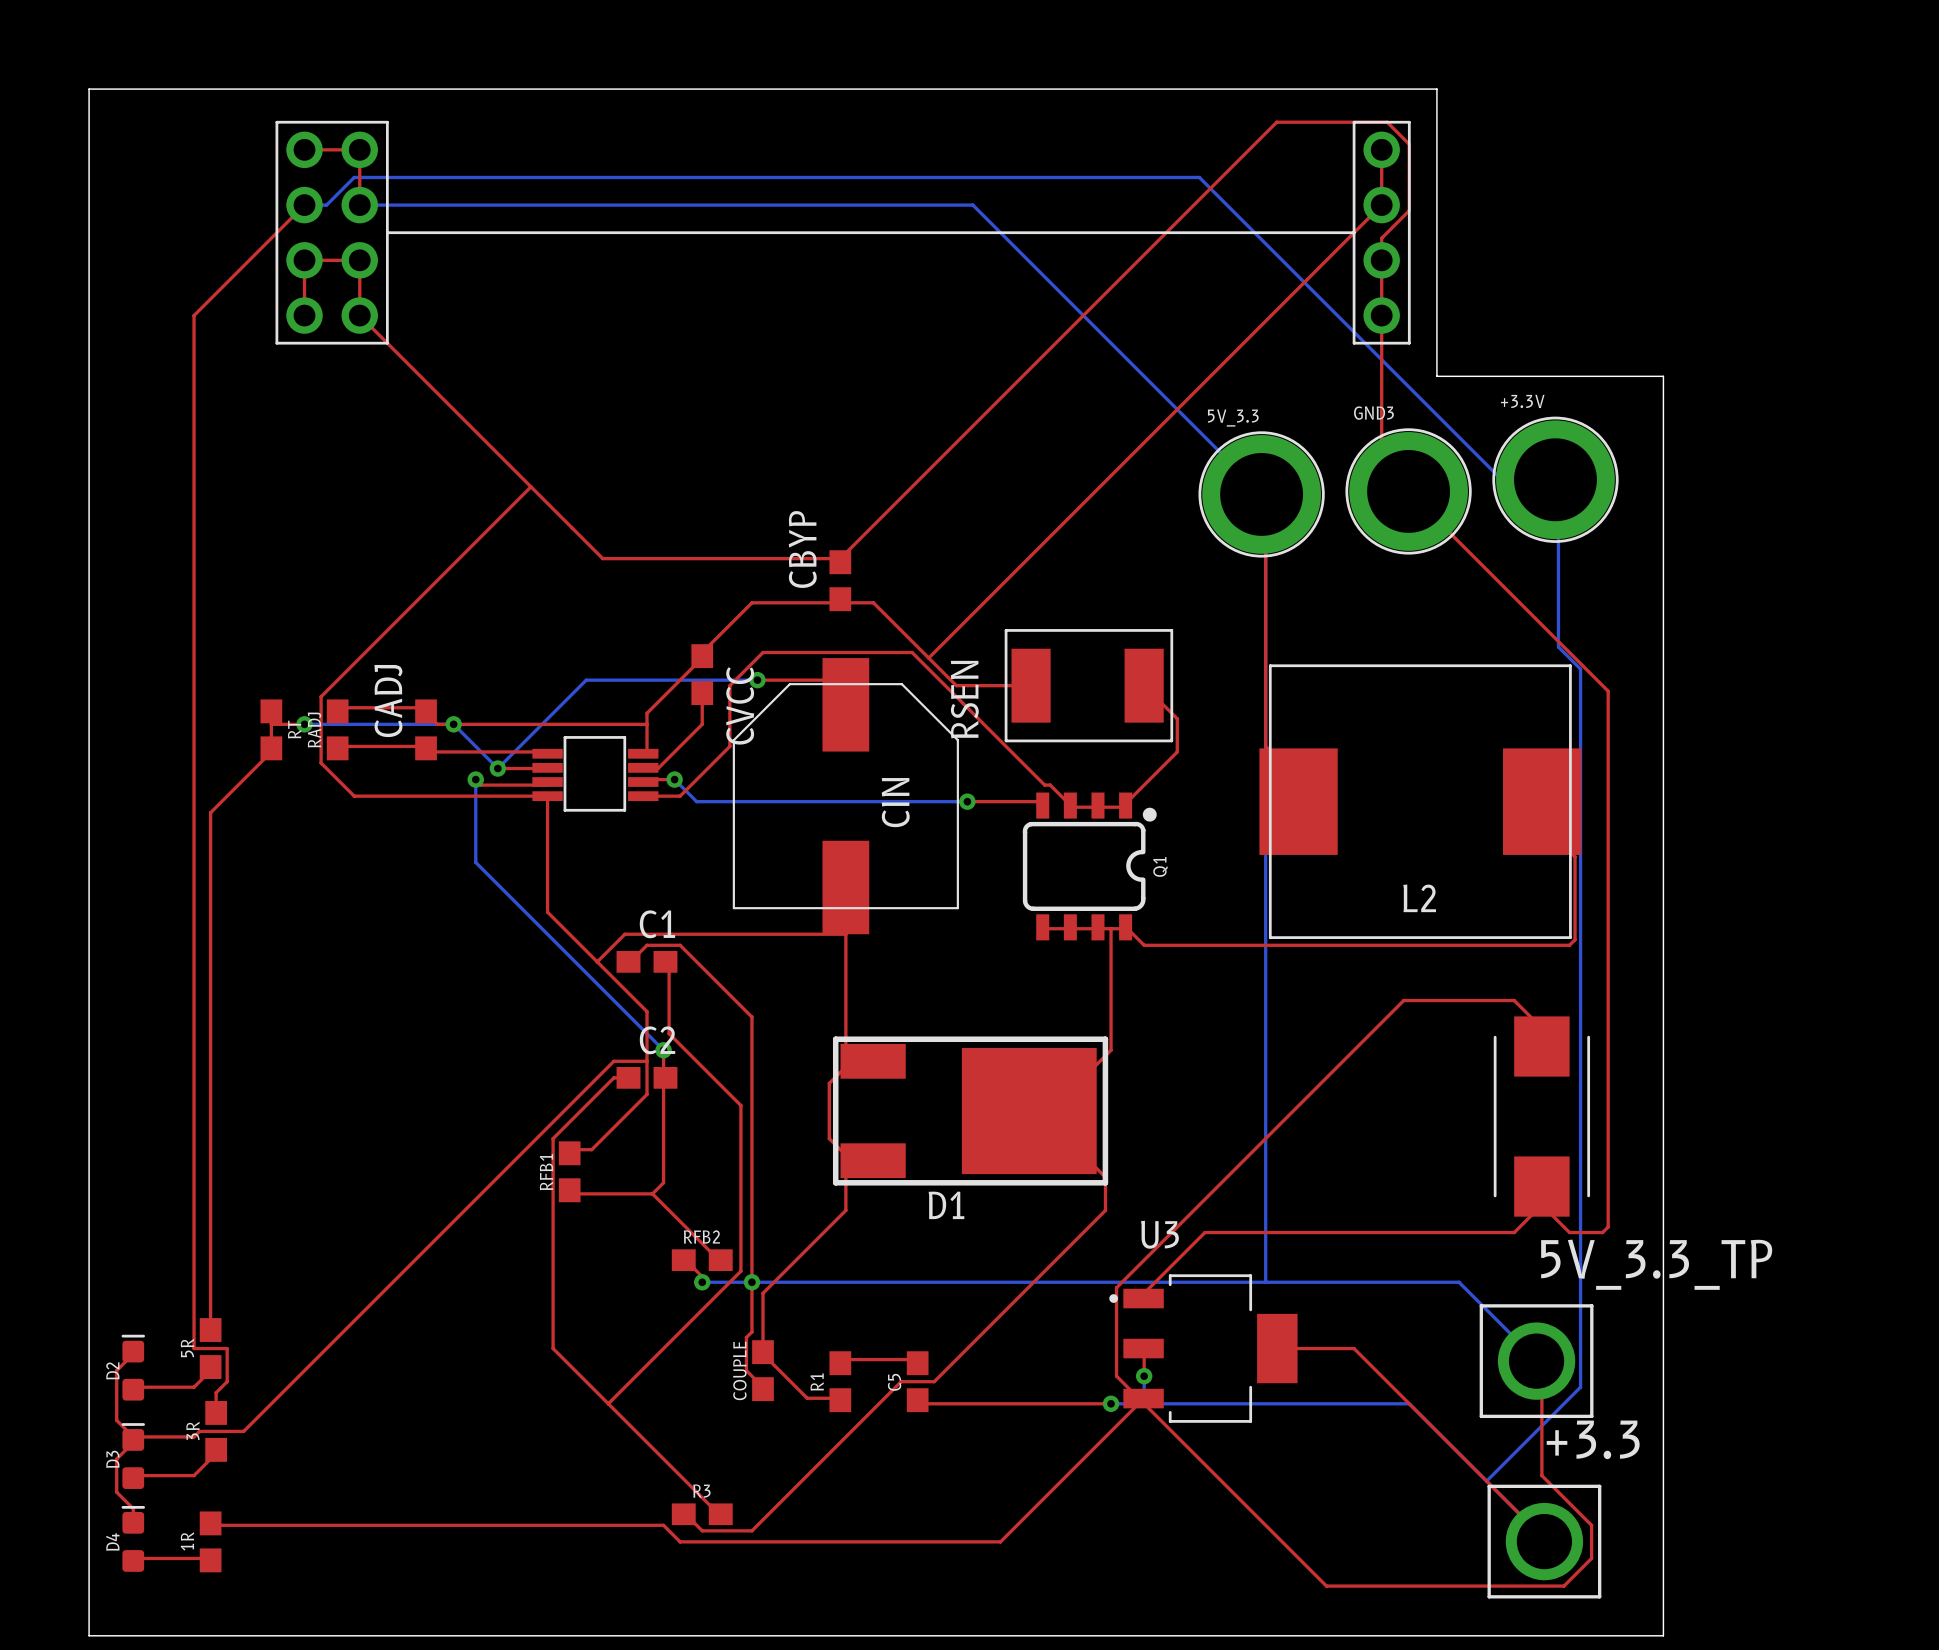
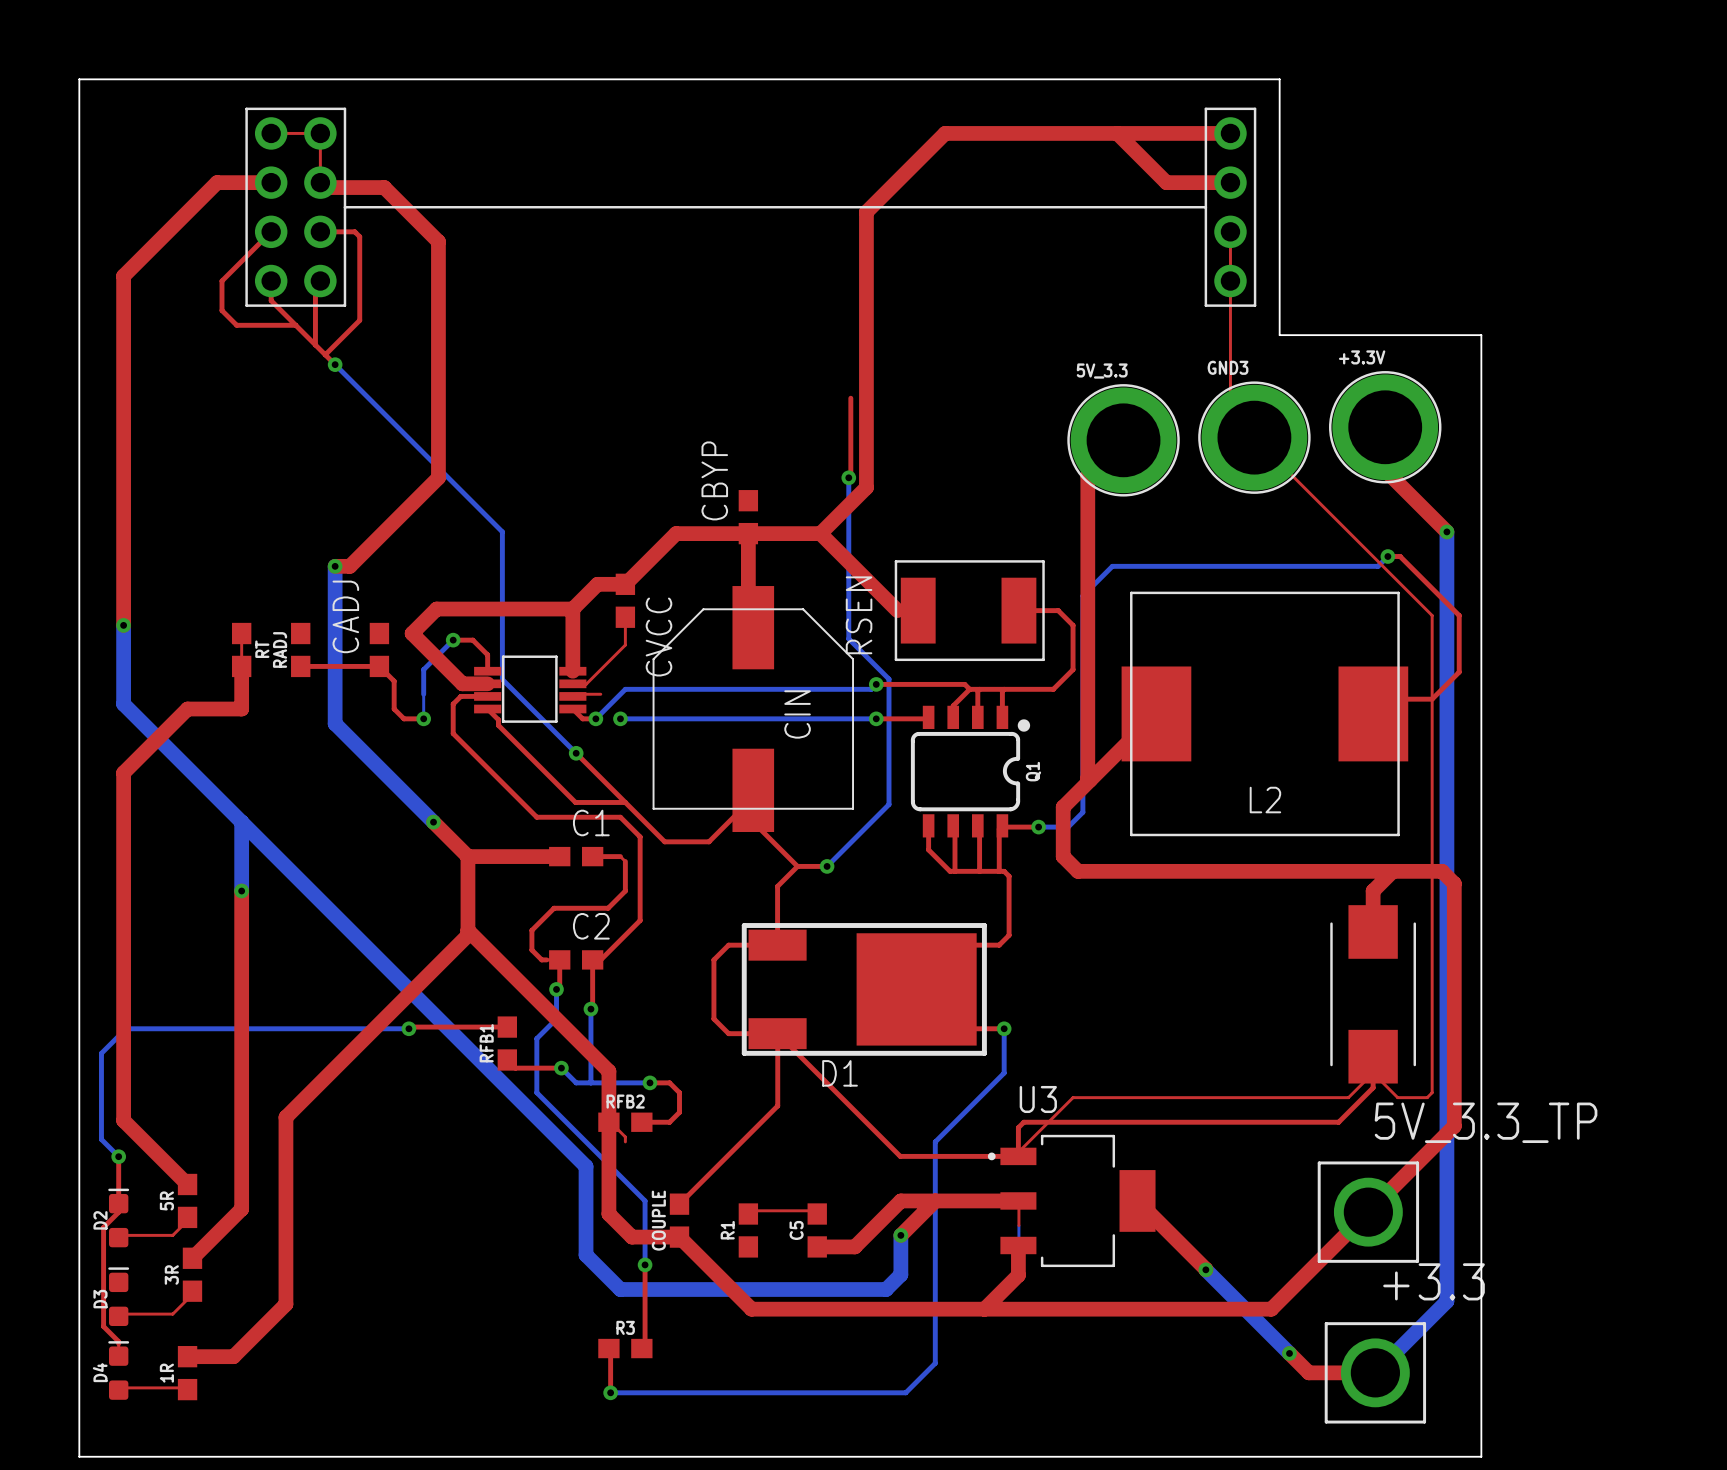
top track: none -> (1117, 133) (1166, 182) (1230, 182)
top track: (1381, 149) (1381, 205) (928, 658) -> (1230, 133) (945, 133) (866, 212) (866, 487) (820, 533)
top track: (304, 205) (194, 315) (194, 1348) (227, 1348) (227, 1381) (216, 1392) (216, 1412) -> (271, 182) (217, 182) (123, 276) (123, 625)
bottom track: (304, 205) (326, 205) (354, 177) (1199, 177) (1497, 475) (1552, 475) (1558, 481) (1558, 647) (1580, 669) (1580, 1387) (1486, 1481) -> none
top track: none -> (320, 182) (325, 187) (384, 187) (438, 241) (438, 477) (349, 566) (335, 566)
bottom track: (359, 205) (972, 205) (1265, 497) (1265, 1282) -> none
top track: none -> (271, 231) (221, 281) (221, 310) (236, 325) (295, 325)
top track: none -> (320, 231) (354, 231) (359, 236) (359, 320) (325, 354)
top track: (1381, 260) (1381, 238) (1409, 210) (1409, 144) (1387, 122) (1276, 122) (840, 558) (602, 558) (359, 315) (359, 260) (304, 260) (304, 315) -> (335, 364) (271, 300) (271, 281)
top track: none -> (320, 281) (315, 285) (315, 344)
bottom track: none -> (335, 364) (502, 531) (502, 679) (576, 753)
via: none -> (335, 364)
top track: none -> (850, 398) (850, 475) (848, 477)
top track: none -> (1385, 427) (1385, 470) (1446, 531)
top track: (531, 486) (321, 696) (321, 763) (354, 796) (547, 796) (547, 912) (647, 1011) (647, 1094) (591, 1149) (569, 1149) (569, 1153) -> (408, 1028) (410, 1027) (507, 1027)
top track: (1261, 494) (1265, 497) (1265, 746) (1293, 774) (1293, 801) (1298, 801) -> (1123, 440) (1087, 476) (1087, 777) (1090, 780)
bottom track: none -> (848, 477) (848, 638) (889, 679) (889, 804) (827, 866)
via: none -> (848, 477)
via: none -> (1446, 531)
top track: none -> (820, 533) (676, 533) (625, 584) (597, 584) (572, 609)
top track: none -> (1387, 556) (1400, 556) (1459, 615) (1459, 672) (1432, 699) (1388, 699) (1373, 713)
bottom track: none -> (1387, 556) (1378, 566) (1112, 566) (1082, 595) (1082, 812) (1068, 827) (1038, 827)
via: none -> (1387, 556)
bottom track: none -> (335, 566) (335, 723) (433, 822)
via: none -> (335, 566)
top track: (757, 680) (823, 680) (845, 702) (845, 704) -> (748, 536) (748, 622) (753, 627)
bottom track: (757, 680) (586, 680) (497, 768) (453, 724) (304, 724) -> none
via: (757, 680) -> none
top track: none -> (572, 609) (572, 671)
top track: (1007, 685) (956, 685) (873, 602) (751, 602) (702, 652) (702, 658) (647, 713) (647, 751) (643, 753) -> (897, 610) (820, 533)
top track: (1144, 685) (1177, 718) (1177, 751) (1125, 805) (1122, 807) (1099, 807) (1097, 805) (1072, 807) (1050, 785) (1044, 785) (912, 652) (763, 652) (729, 685) (729, 746) (680, 796) (643, 796) -> (1018, 610) (1058, 610) (1073, 625) (1073, 669) (1053, 689) (969, 689)
bottom track: none -> (123, 625) (123, 704) (586, 1166) (586, 1255) (620, 1289) (886, 1289) (900, 1274) (900, 1235)
via: none -> (123, 625)
top track: (337, 711) (337, 707) (426, 707) (426, 713) (437, 724) (647, 724) -> none
top track: none -> (453, 640) (472, 640) (487, 654) (487, 669)
bottom track: none -> (453, 640) (423, 669) (423, 694)
via: none -> (453, 640)
top track: (271, 724) (304, 724) -> none
via: (304, 724) -> none
via: (453, 724) -> none
top track: (337, 748) (337, 746) (426, 746) (426, 751) (547, 751) -> (300, 666) (379, 666) (394, 681) (394, 709) (404, 718) (423, 718)
top track: (271, 751) (210, 812) (210, 1330) -> (241, 669) (241, 709) (187, 709) (123, 772) (123, 1120) (187, 1184)
top track: (547, 767) (497, 768) -> (487, 683) (462, 683) (412, 633) (436, 609) (572, 609)
via: (497, 768) -> none
top track: none -> (876, 684) (964, 684) (969, 689)
bottom track: none -> (876, 684) (871, 689) (625, 689) (595, 718)
via: none -> (876, 684)
top track: none -> (969, 689) (953, 705) (953, 717)
top track: none -> (979, 689) (977, 691) (977, 717)
top track: none -> (1004, 689) (1002, 691) (1002, 717)
top track: (475, 779) (481, 785) (547, 785) (547, 782) -> (590, 1009) (592, 1007) (592, 959) (600, 959) (640, 920) (640, 836) (620, 817) (536, 817) (453, 733) (453, 704) (460, 696) (487, 696)
via: (475, 779) -> none
bottom track: (674, 779) (696, 801) (967, 801) -> none
via: (674, 779) -> none
top track: none -> (487, 709) (498, 719) (498, 725) (575, 802) (625, 802)
top track: none -> (572, 709) (582, 718) (595, 718)
top track: (967, 801) (1039, 801) (1042, 805) -> (876, 718) (928, 717)
via position: (967, 801) -> (876, 718)
top track: none -> (1156, 713) (1063, 807) (1063, 856) (1077, 871) (1442, 871) (1454, 883) (1454, 1126) (1271, 1309) (751, 1309) (679, 1237) (632, 1237) (608, 1214) (608, 1071) (467, 930)
top track: (1542, 801) (1547, 801) (1547, 829) (1575, 856) (1575, 939) (1569, 945) (1144, 945) (1125, 927) (1042, 927) -> (1004, 1028) (955, 1028) (916, 989) (960, 945) (999, 945) (1009, 935) (1009, 876) (1004, 871) (950, 871) (928, 849) (928, 825)
bottom track: (475, 807) (475, 862) (663, 1050) -> none
via: none -> (423, 718)
via: none -> (595, 718)
bottom track: none -> (620, 718) (876, 718)
via: none -> (620, 718)
top track: none -> (576, 753) (664, 841) (709, 841) (753, 797)
via: none -> (576, 753)
bottom track: none -> (241, 822) (241, 891)
top track: none -> (433, 822) (467, 856)
via: none -> (433, 822)
top track: (845, 923) (845, 1066) (829, 1083) (829, 1138) (845, 1155) (845, 1210) (763, 1293) (763, 1354) (807, 1398) (840, 1398) (840, 1400) -> (753, 822) (797, 866)
top track: none -> (953, 825) (954, 827) (954, 871)
top track: none -> (977, 825) (979, 827) (979, 871)
top track: (1111, 928) (1111, 1050) (1044, 1116) (1029, 1111) (1039, 1111) (1105, 1177) (1105, 1210) (934, 1381) (901, 1381) (751, 1530) (702, 1530) (683, 1514) -> (610, 1392) (610, 1350) (608, 1348)
top track: none -> (1038, 827) (1002, 825) (999, 829) (999, 871)
via: none -> (1038, 827)
top track: (845, 934) (624, 934) (597, 961) -> none
top track: none -> (467, 856) (559, 856)
top track: (628, 961) (647, 945) (680, 945) (696, 961) -> (595, 856) (620, 856)
top track: (669, 961) (669, 1033) (740, 1105) (740, 1271) (608, 1403) -> none
top track: (702, 967) (751, 1017) (751, 1331) (746, 1337) (746, 1370) (763, 1389) -> (625, 861) (625, 891) (608, 908) (554, 908) (531, 930) (531, 950) (541, 959) (546, 959)
top track: none -> (797, 866) (827, 866)
top track: none -> (797, 866) (777, 886) (777, 945) (728, 945) (713, 959) (713, 1018) (728, 1033) (777, 1033) (900, 1156) (1018, 1156) (1018, 1127) (1023, 1122) (1338, 1122) (1373, 1087) (1373, 1073)
via: none -> (827, 866)
top track: none -> (241, 891) (241, 1209) (192, 1258)
via: none -> (241, 891)
top track: (1541, 1028) (1514, 1000) (1403, 1000) (1116, 1287) (1116, 1376) (1138, 1398) (1143, 1398) -> (1373, 915) (1373, 891) (1392, 871)
top track: (663, 1050) (663, 1182) (652, 1193) -> none
via: (663, 1050) -> none
top track: (647, 1061) (613, 1061) (243, 1431) (199, 1431) (194, 1436) (133, 1436) -> none
top track: (613, 1077) (553, 1138) (553, 1348) (720, 1514) -> (645, 1264) (645, 1345) (641, 1348)
top track: none -> (559, 959) (559, 986) (556, 989)
bottom track: none -> (556, 989) (556, 1018) (536, 1038) (536, 1092) (645, 1200) (645, 1264)
via: none -> (556, 989)
bottom track: none -> (590, 1009) (590, 1082)
via: none -> (590, 1009)
bottom track: none -> (408, 1028) (126, 1028) (101, 1053) (101, 1139) (118, 1156)
via: none -> (408, 1028)
bottom track: none -> (1004, 1028) (1004, 1073) (935, 1141) (935, 1363) (905, 1392) (610, 1392)
via: none -> (1004, 1028)
top track: none -> (777, 1033) (777, 1105) (679, 1204)
top track: (569, 1190) (569, 1193) (652, 1193) -> (507, 1059) (515, 1068) (561, 1068)
top track: (652, 1193) (720, 1260) -> (649, 1082) (669, 1082) (679, 1092) (679, 1112) (669, 1122) (641, 1122)
bottom track: none -> (561, 1068) (576, 1082) (649, 1082)
via: none -> (561, 1068)
via: none -> (649, 1082)
bottom track: (702, 1282) (1459, 1282) (1536, 1361) -> none
via: (702, 1282) -> none
via: (751, 1282) -> none
top track: none -> (118, 1156) (118, 1203)
via: none -> (118, 1156)
top track: none -> (935, 1200) (900, 1235)
top track: (1277, 1348) (1354, 1348) (1541, 1536) (1544, 1541) -> (1137, 1200) (1205, 1269)
top track: (133, 1354) (116, 1370) (116, 1420) (133, 1436) -> (118, 1205) (118, 1212) (103, 1227) (103, 1326) (118, 1343)
top track: (1536, 1361) (1541, 1365) (1541, 1475) (1591, 1525) (1591, 1558) (1563, 1586) (1326, 1586) (1144, 1403) (1143, 1398) -> (984, 1309) (1018, 1275) (1018, 1245)
via: (1144, 1376) -> none
via: none -> (900, 1235)
top track: (1143, 1398) (1000, 1541) (680, 1541) (663, 1525) (210, 1525) (210, 1523) -> (467, 856) (467, 935) (285, 1117) (285, 1304) (233, 1356) (187, 1356)
top track: (917, 1400) (917, 1403) (1111, 1403) -> (817, 1246) (854, 1246) (900, 1200) (1018, 1200)
bottom track: (1111, 1403) (1409, 1403) (1541, 1536) (1544, 1541) -> (1446, 531) (1446, 1301) (1375, 1372)
via: (1111, 1403) -> none
via: none -> (645, 1264)
bottom track: none -> (1205, 1269) (1289, 1353)
via: none -> (1205, 1269)
top track: (133, 1436) (133, 1442) (116, 1459) (116, 1492) (133, 1508) -> none
top track: none -> (1289, 1353) (1308, 1372) (1375, 1372)
via: none -> (1289, 1353)
via: none -> (610, 1392)

